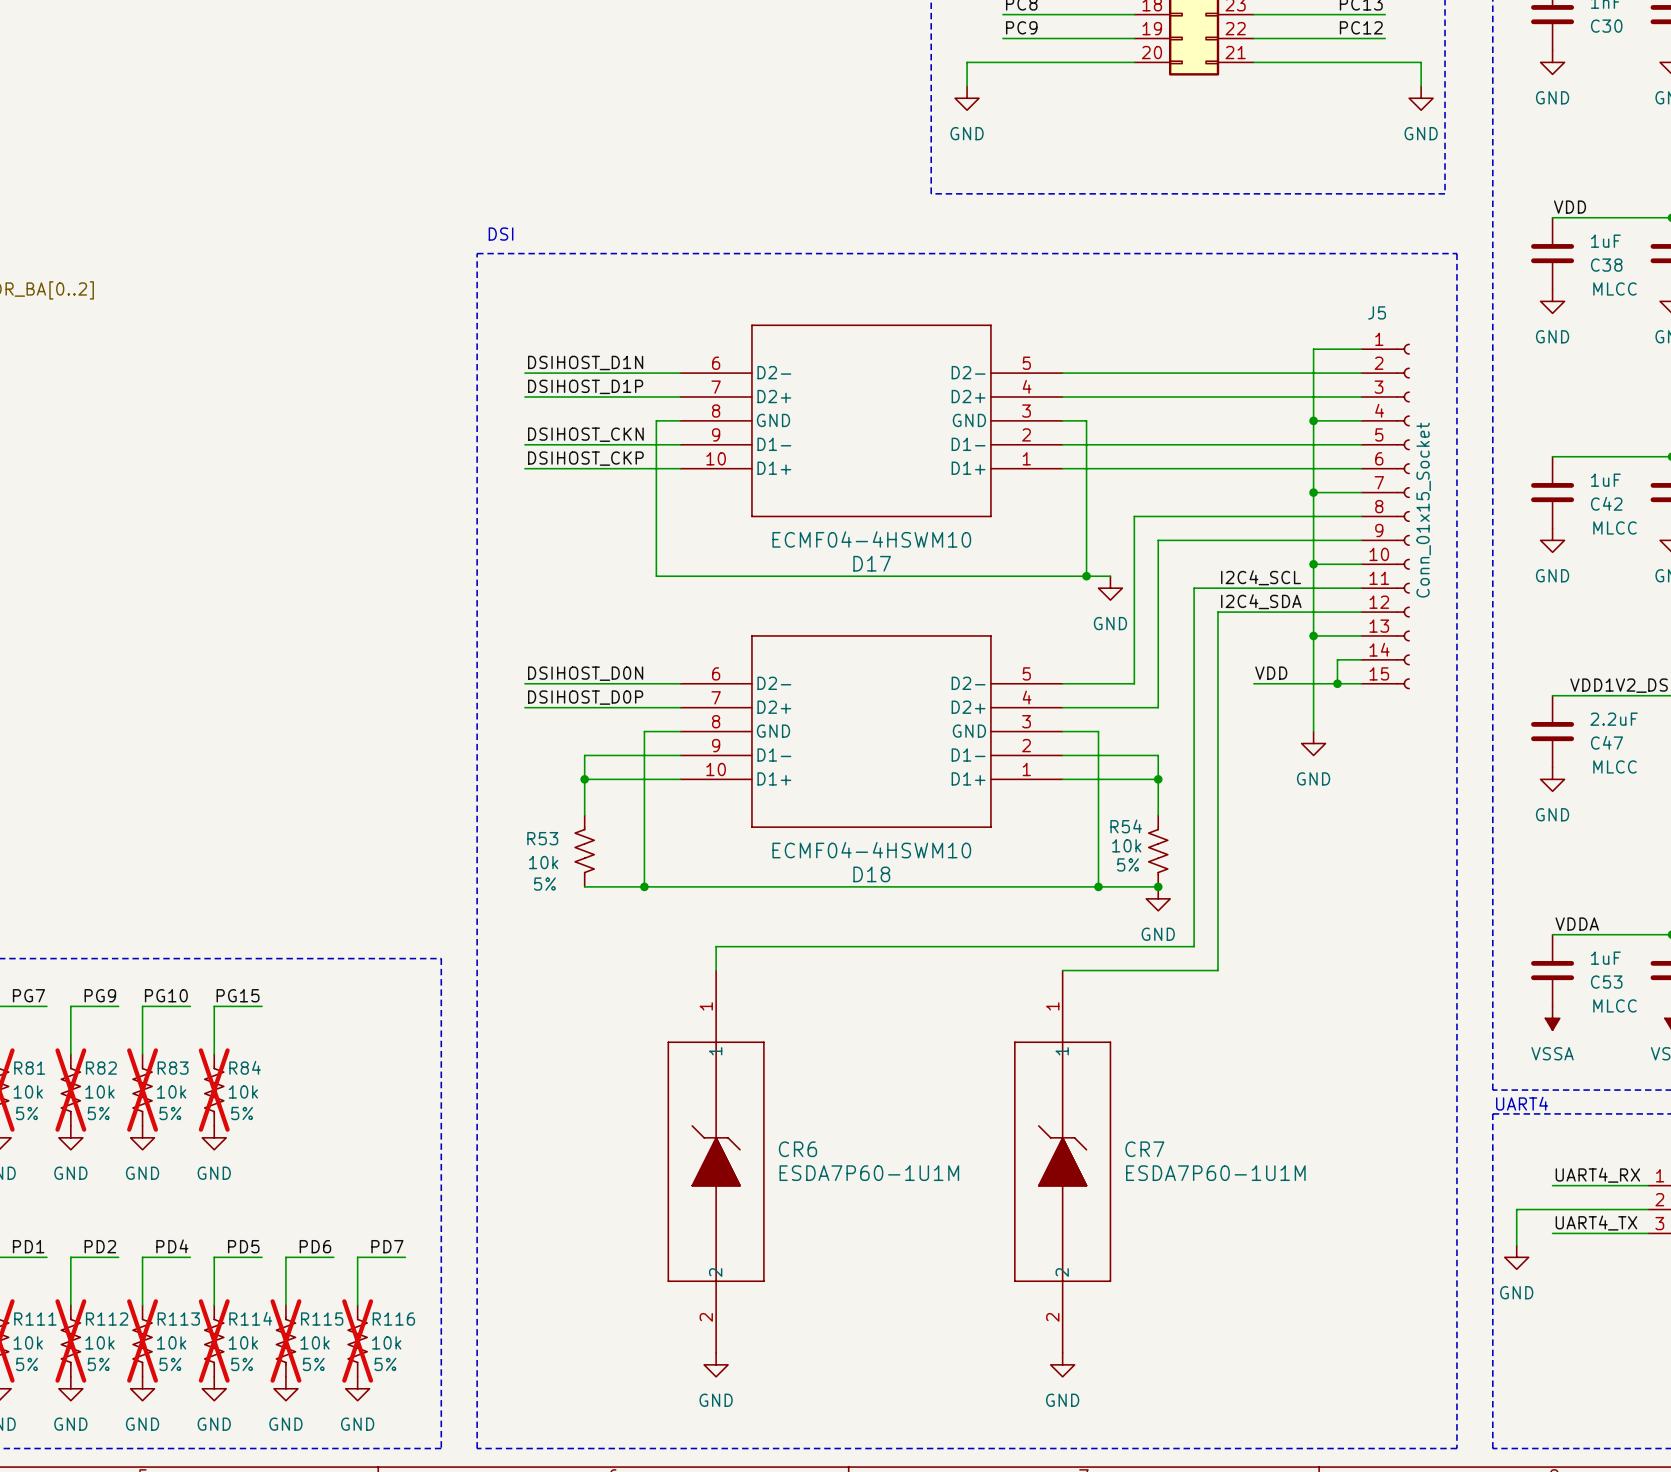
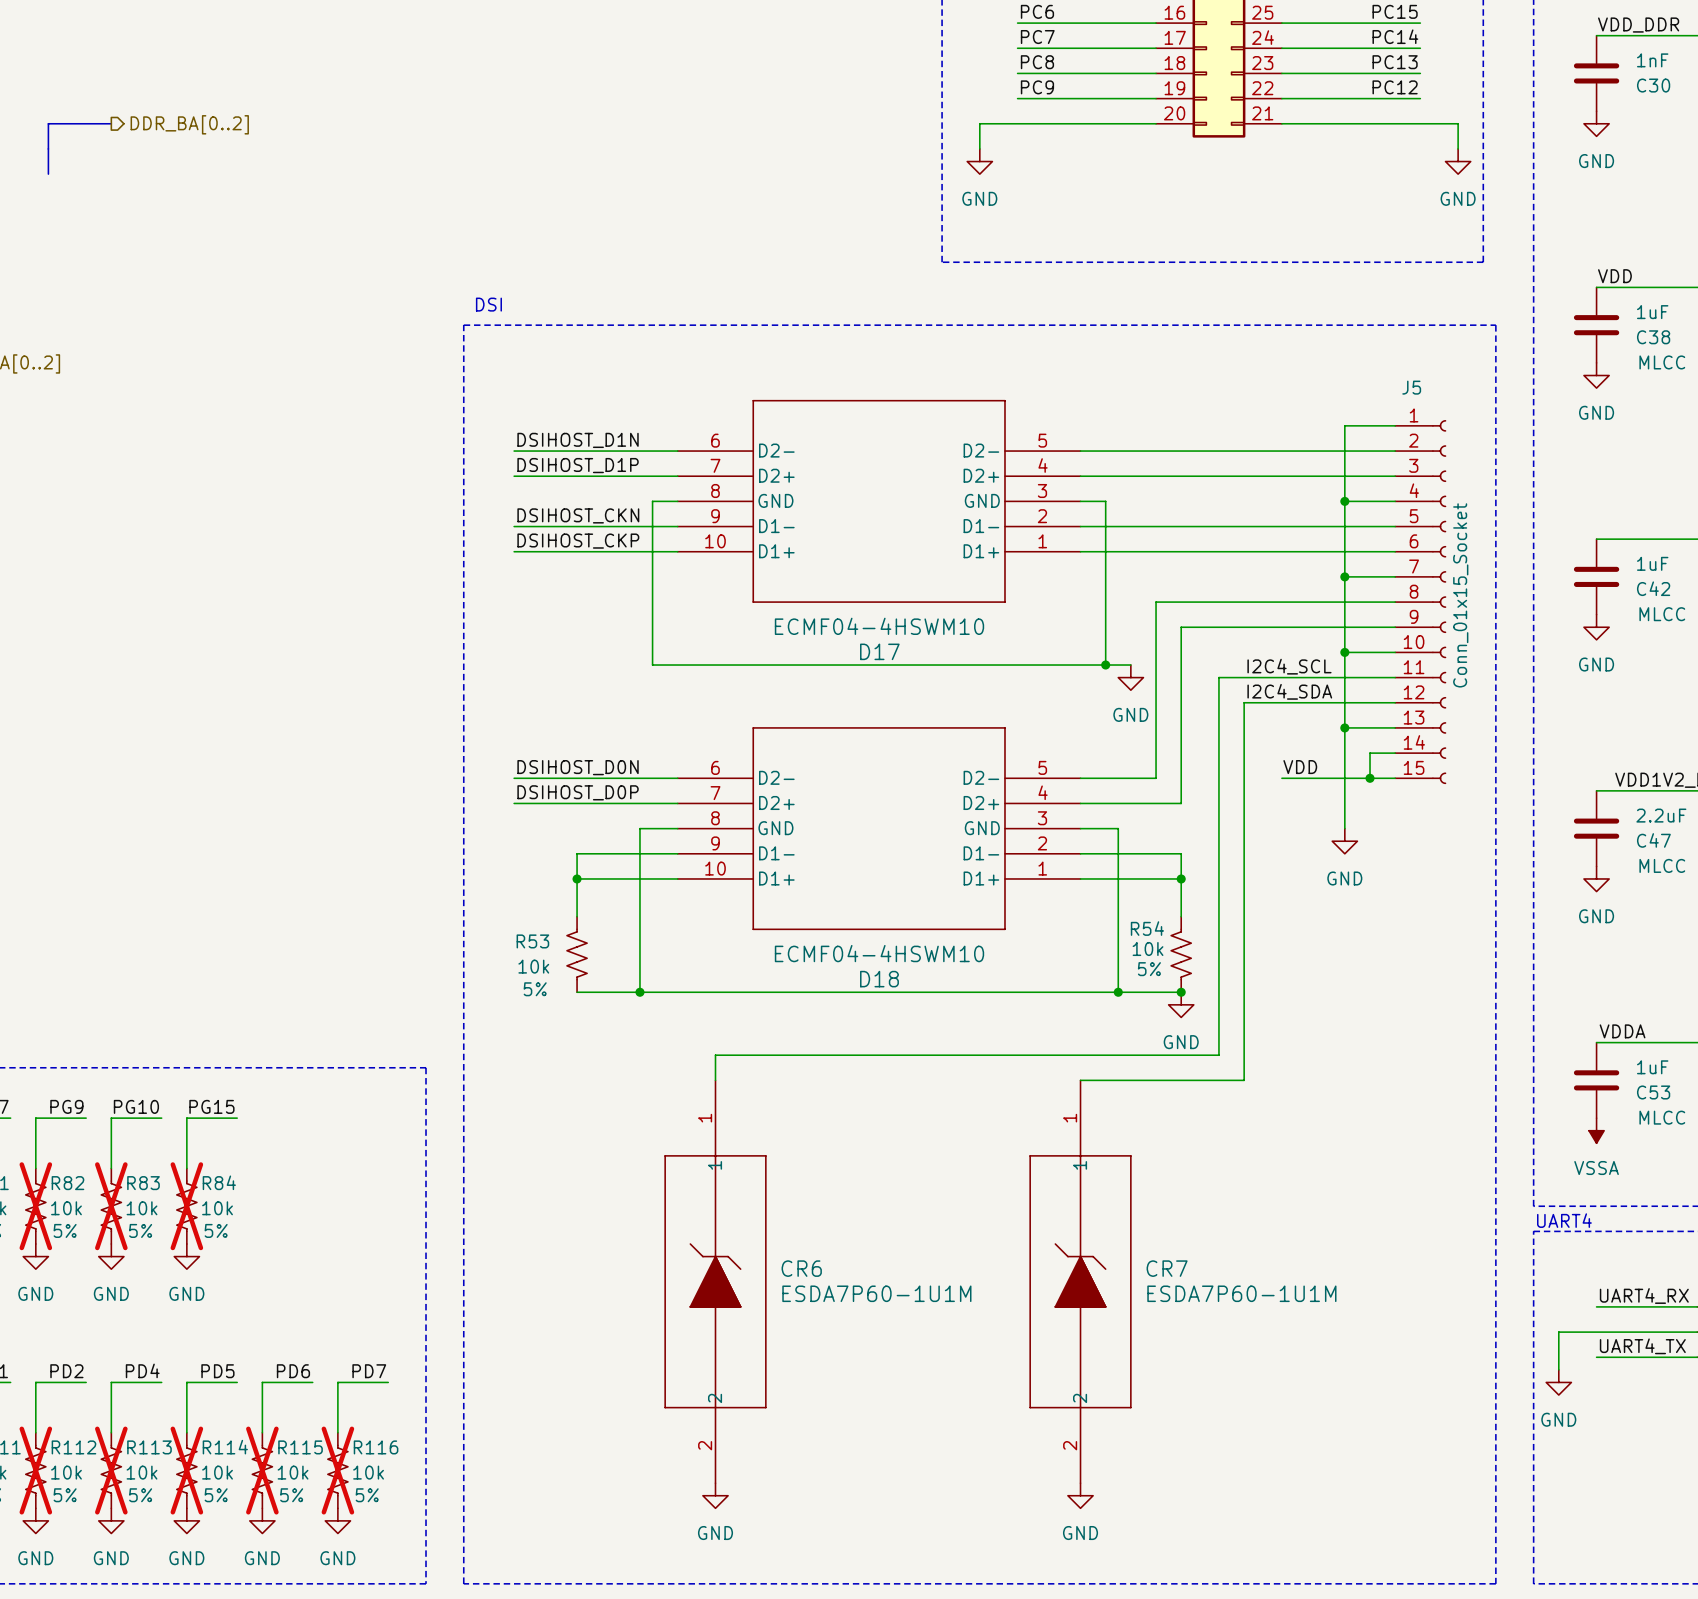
bus: none -> (111, 123) (48, 123) (48, 174)
hierarchical label: none -> DDR_BA[0..2] (189, 124)

